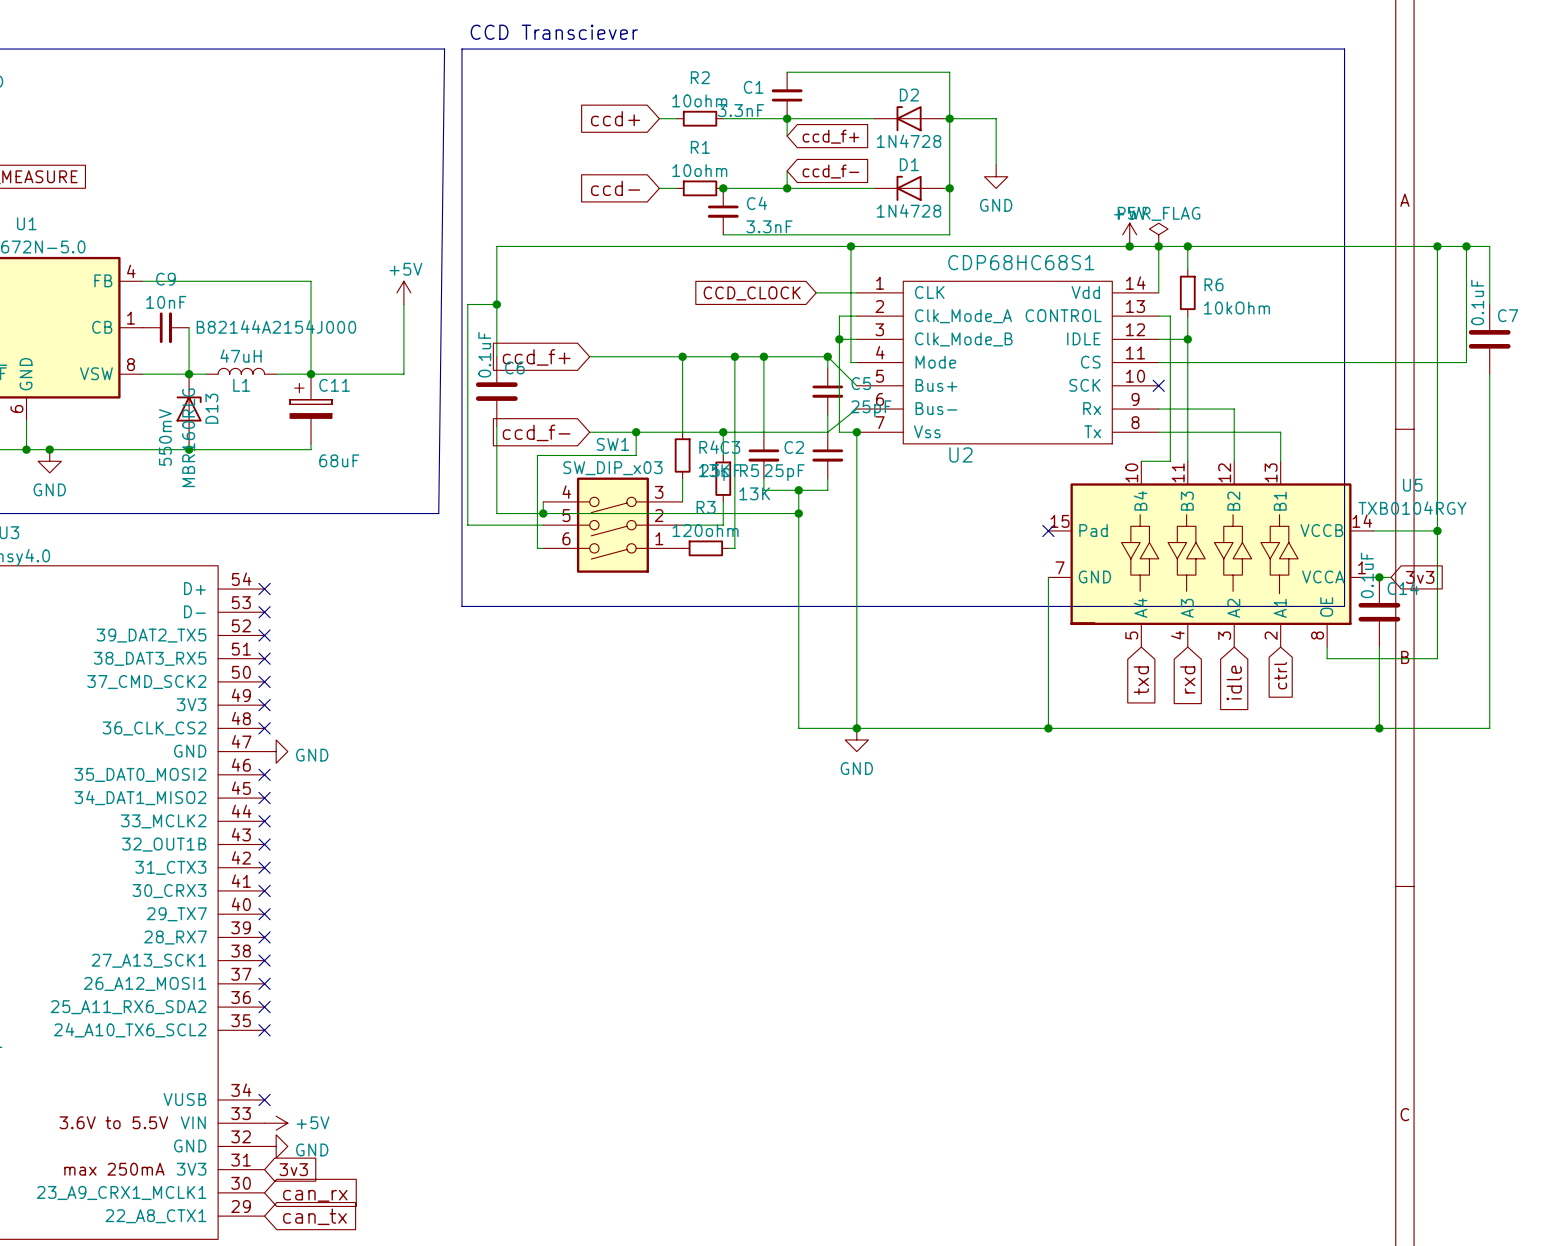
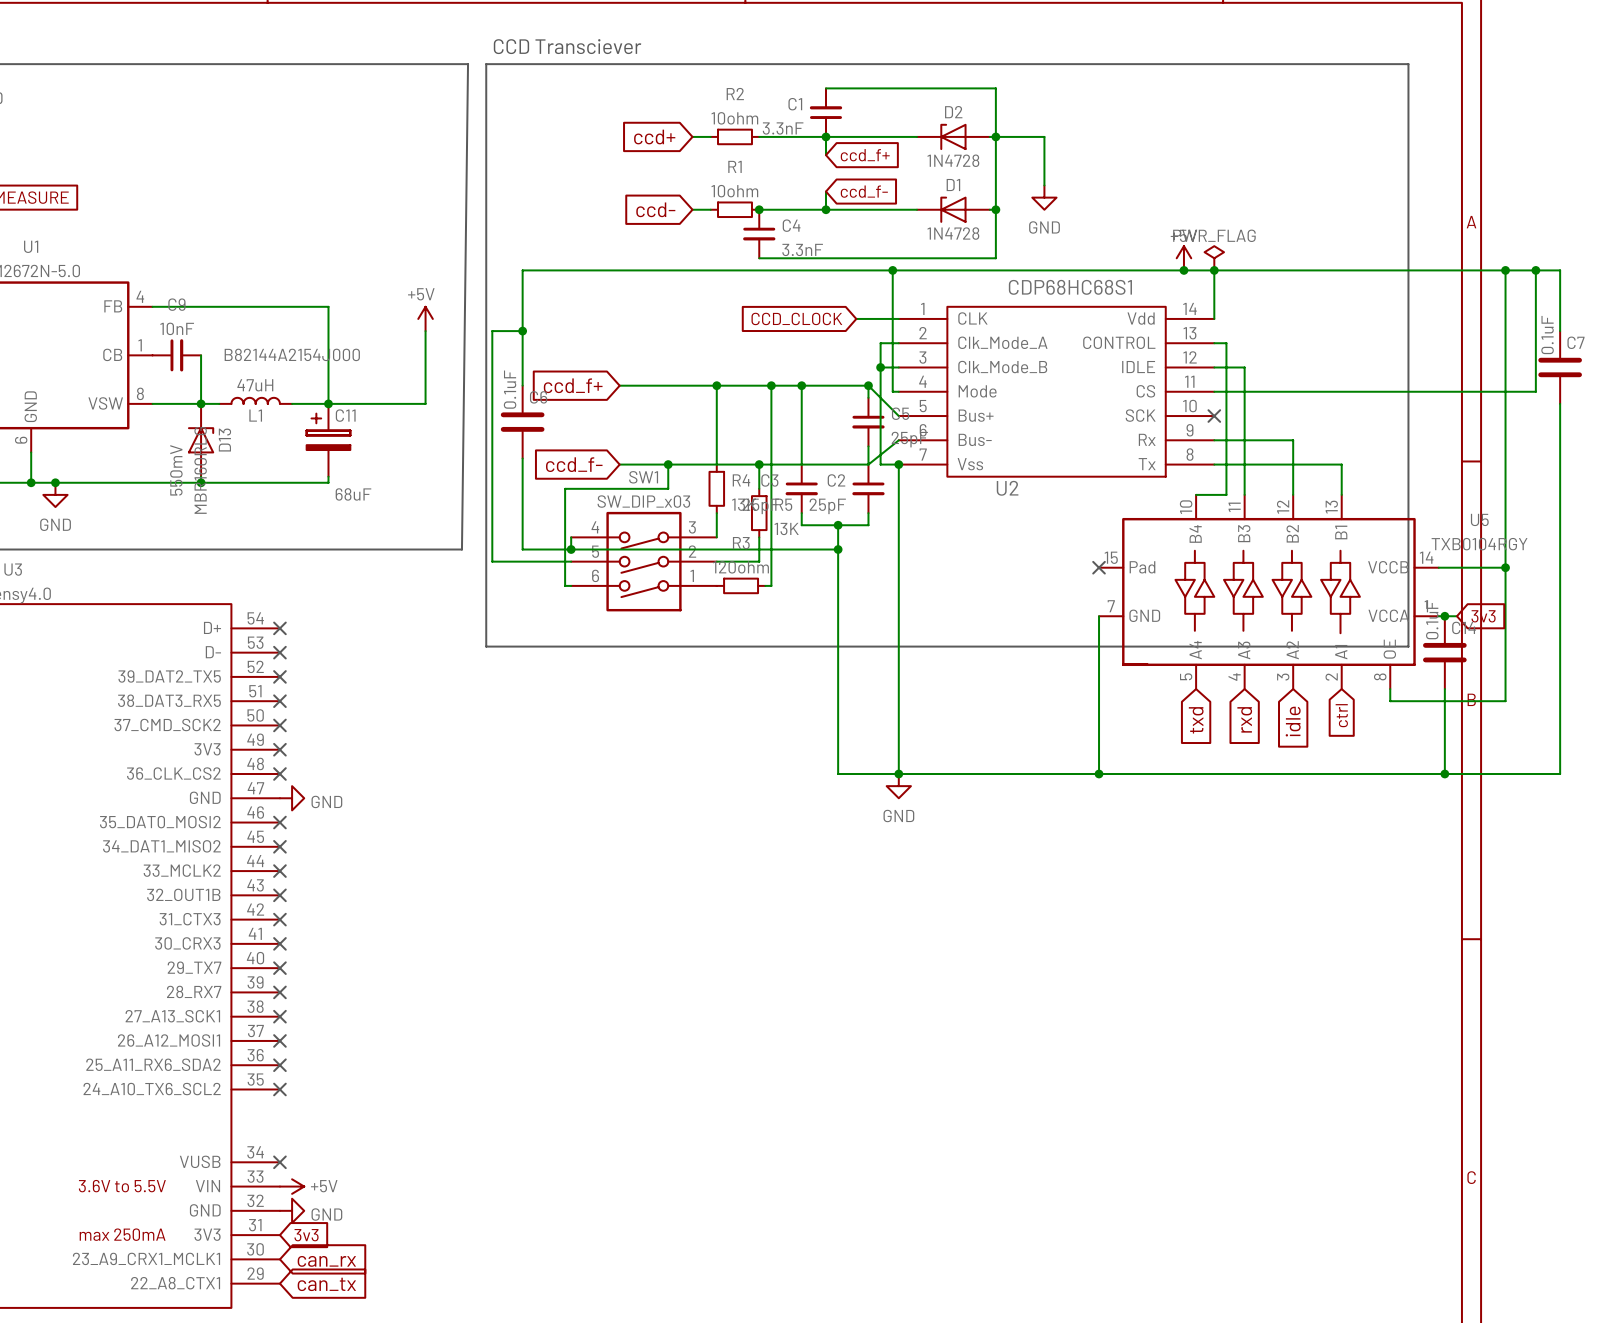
wire: (1187, 246) (1187, 269) -> none
junction: (1187, 246) -> none
R6: 10kOhm (1187, 292) -> none
wire: (1187, 316) (1187, 339) -> none
junction: (1187, 339) -> none

